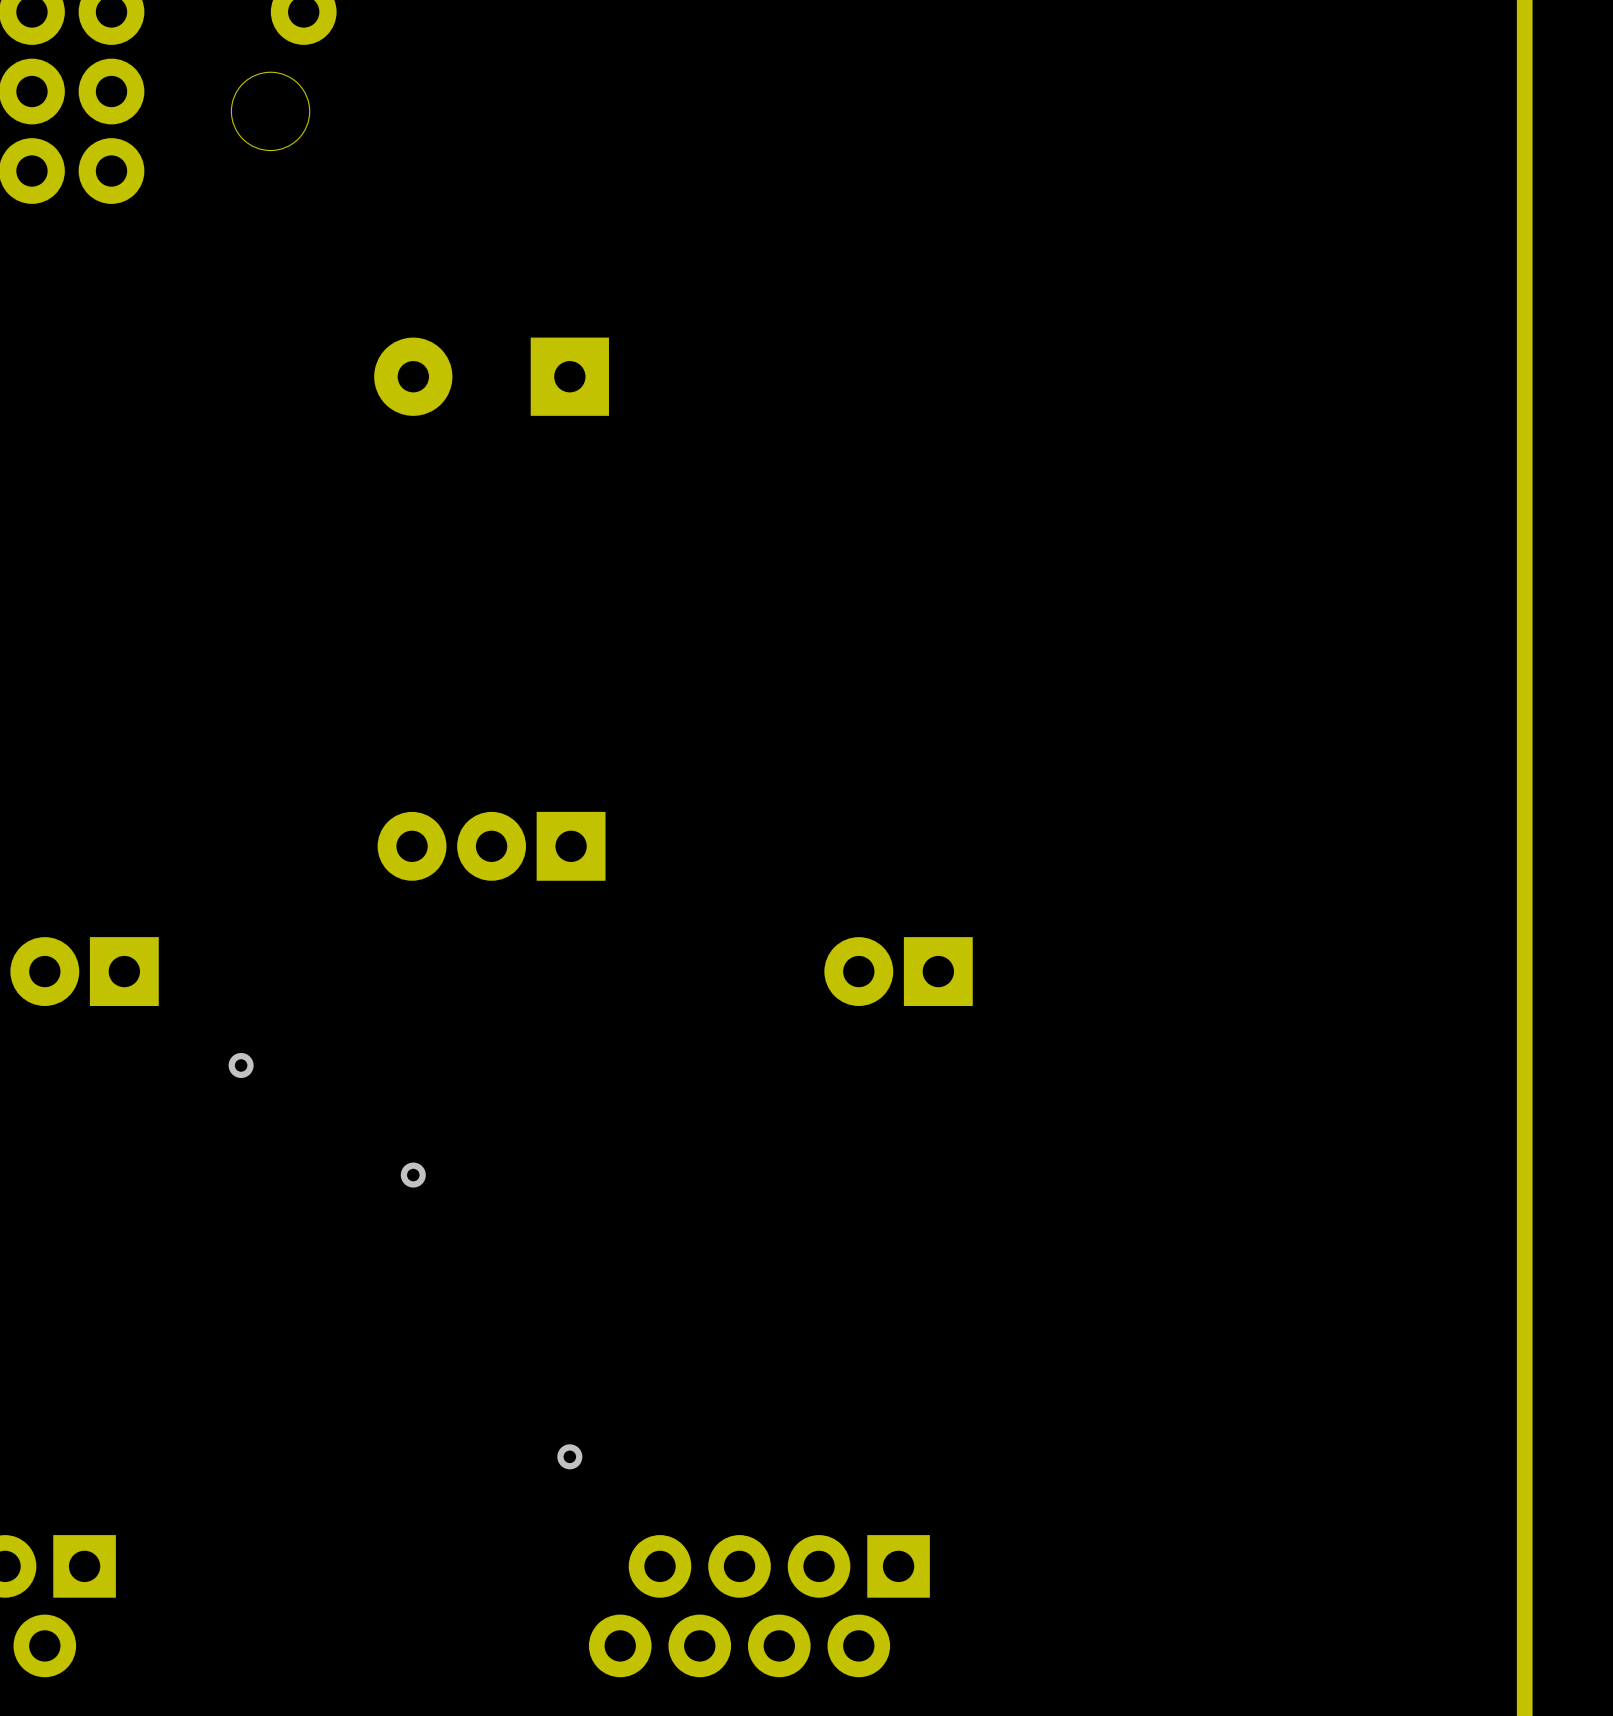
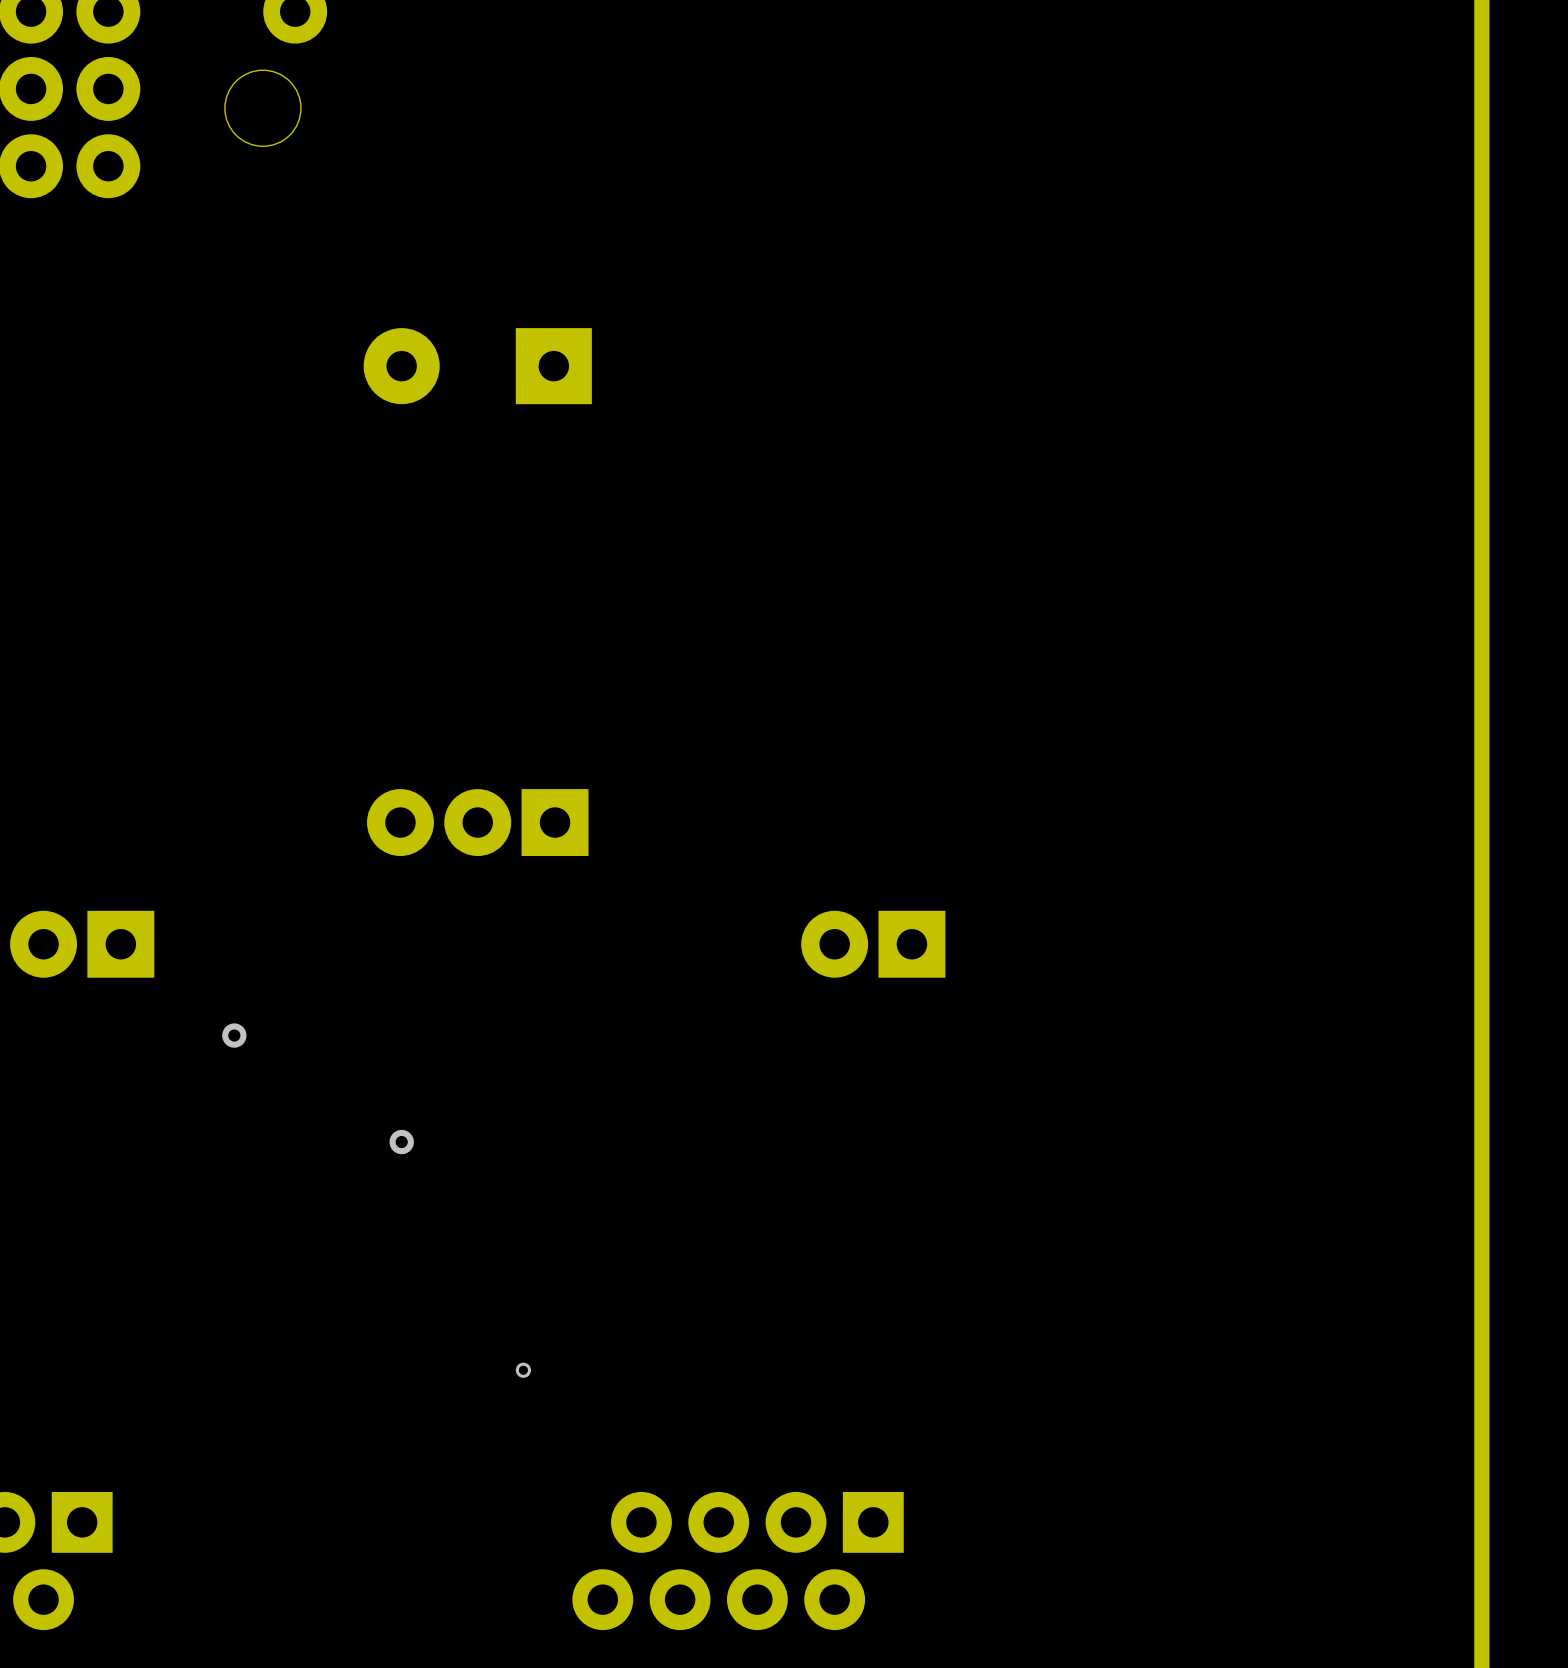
via: none -> (523, 1370)
via: (569, 1456) -> none

